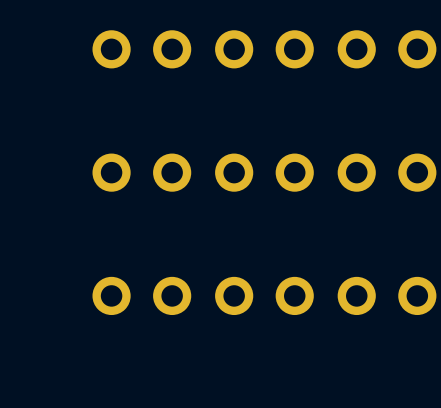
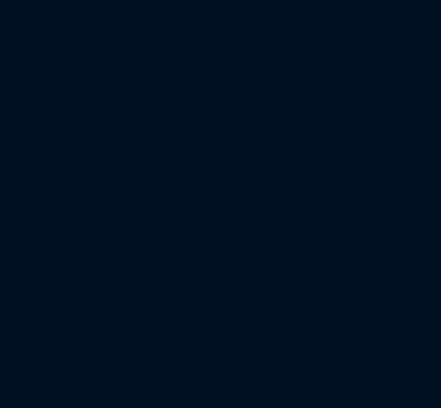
part: (141, 49) -> none
part: (264, 49) -> none
part: (387, 49) -> none
part: (141, 172) -> none
part: (264, 172) -> none
part: (387, 172) -> none
part: (141, 295) -> none
part: (264, 295) -> none
part: (387, 295) -> none

